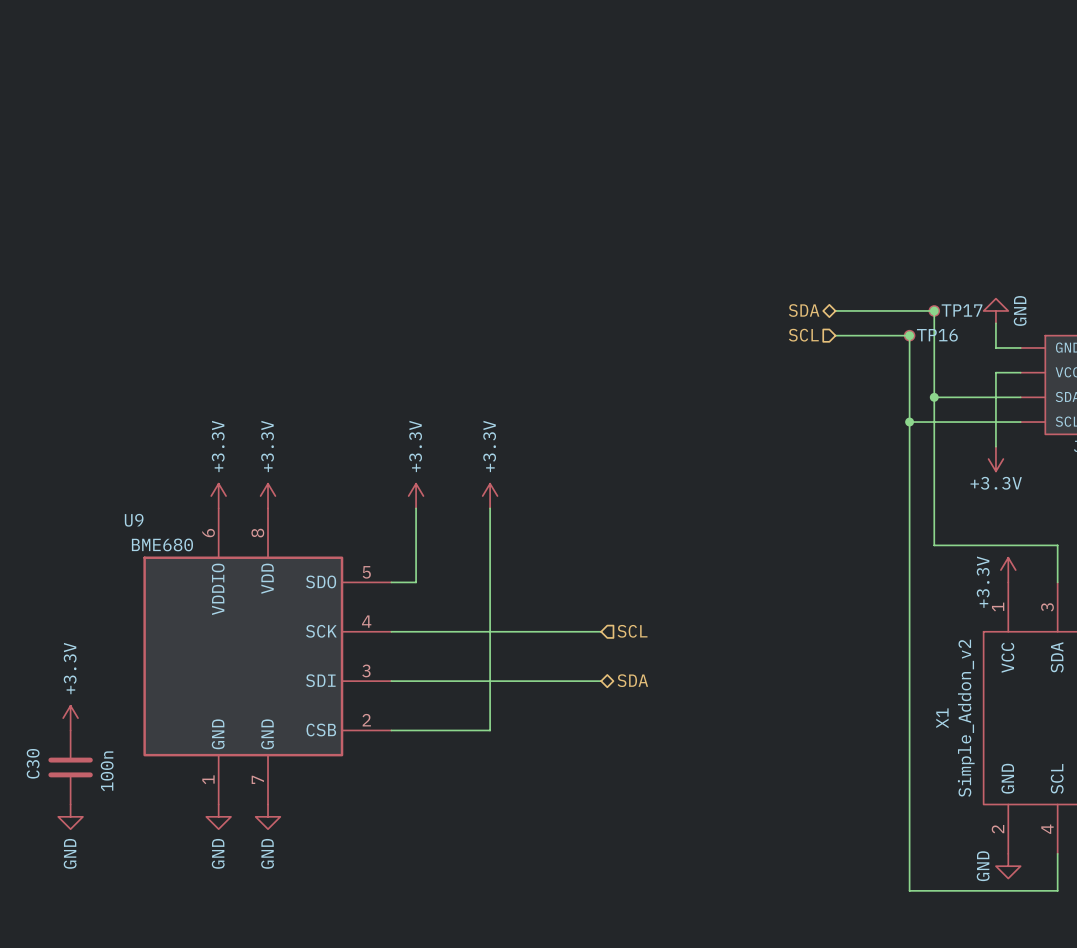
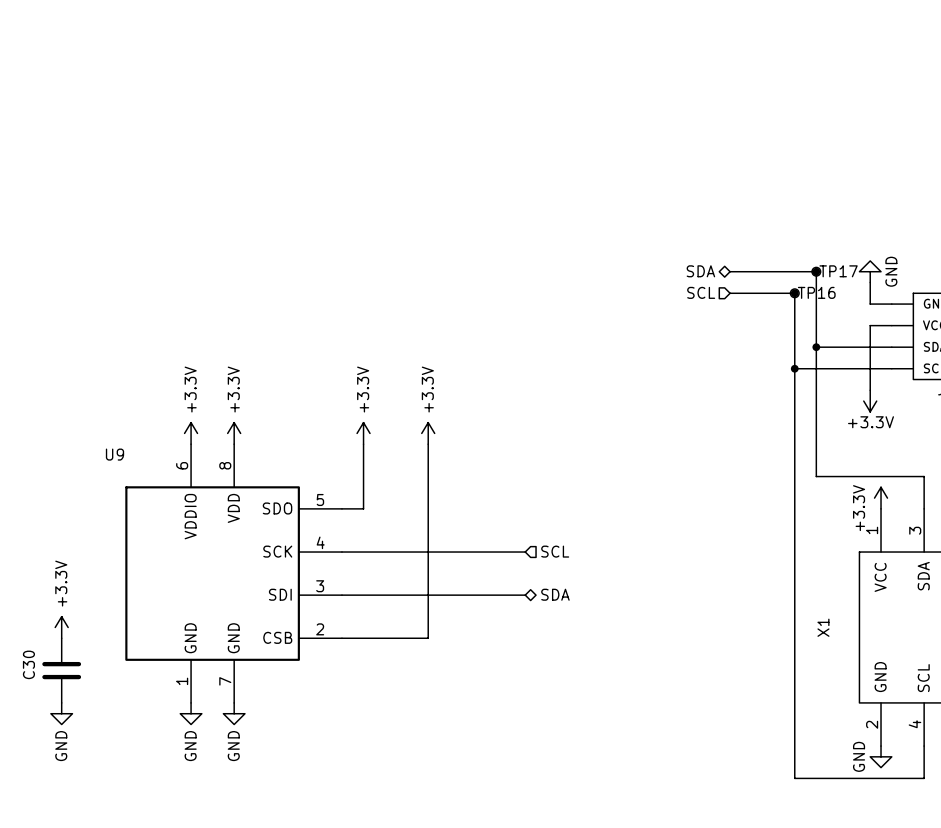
U9 value: BME680 (162, 544) -> none
X1 value: Simple_Addon_v2 (966, 718) -> none
C30 value: 100n (107, 771) -> none

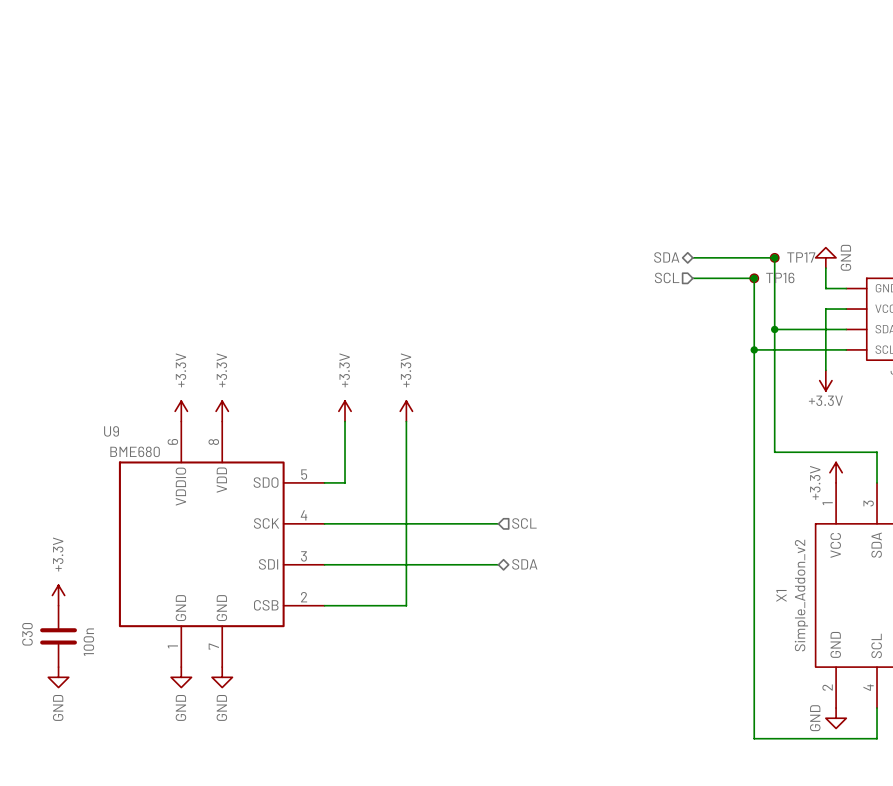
U9 value: none -> BME680 (135, 451)
X1 value: none -> Simple_Addon_v2 (801, 595)
C30 value: none -> 100n (88, 642)

